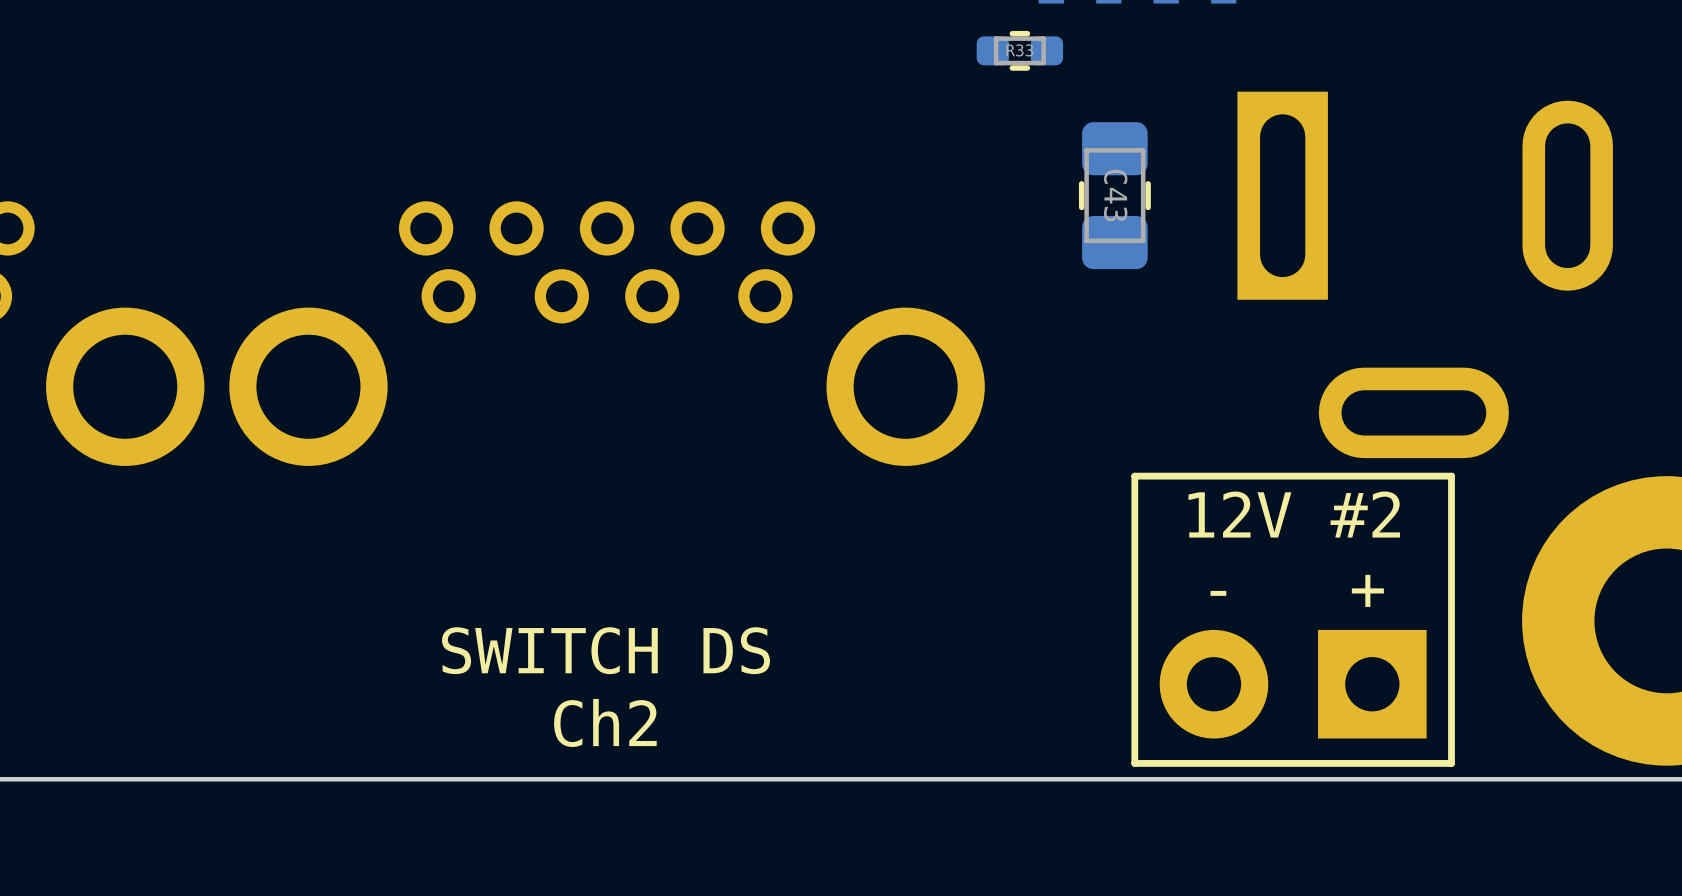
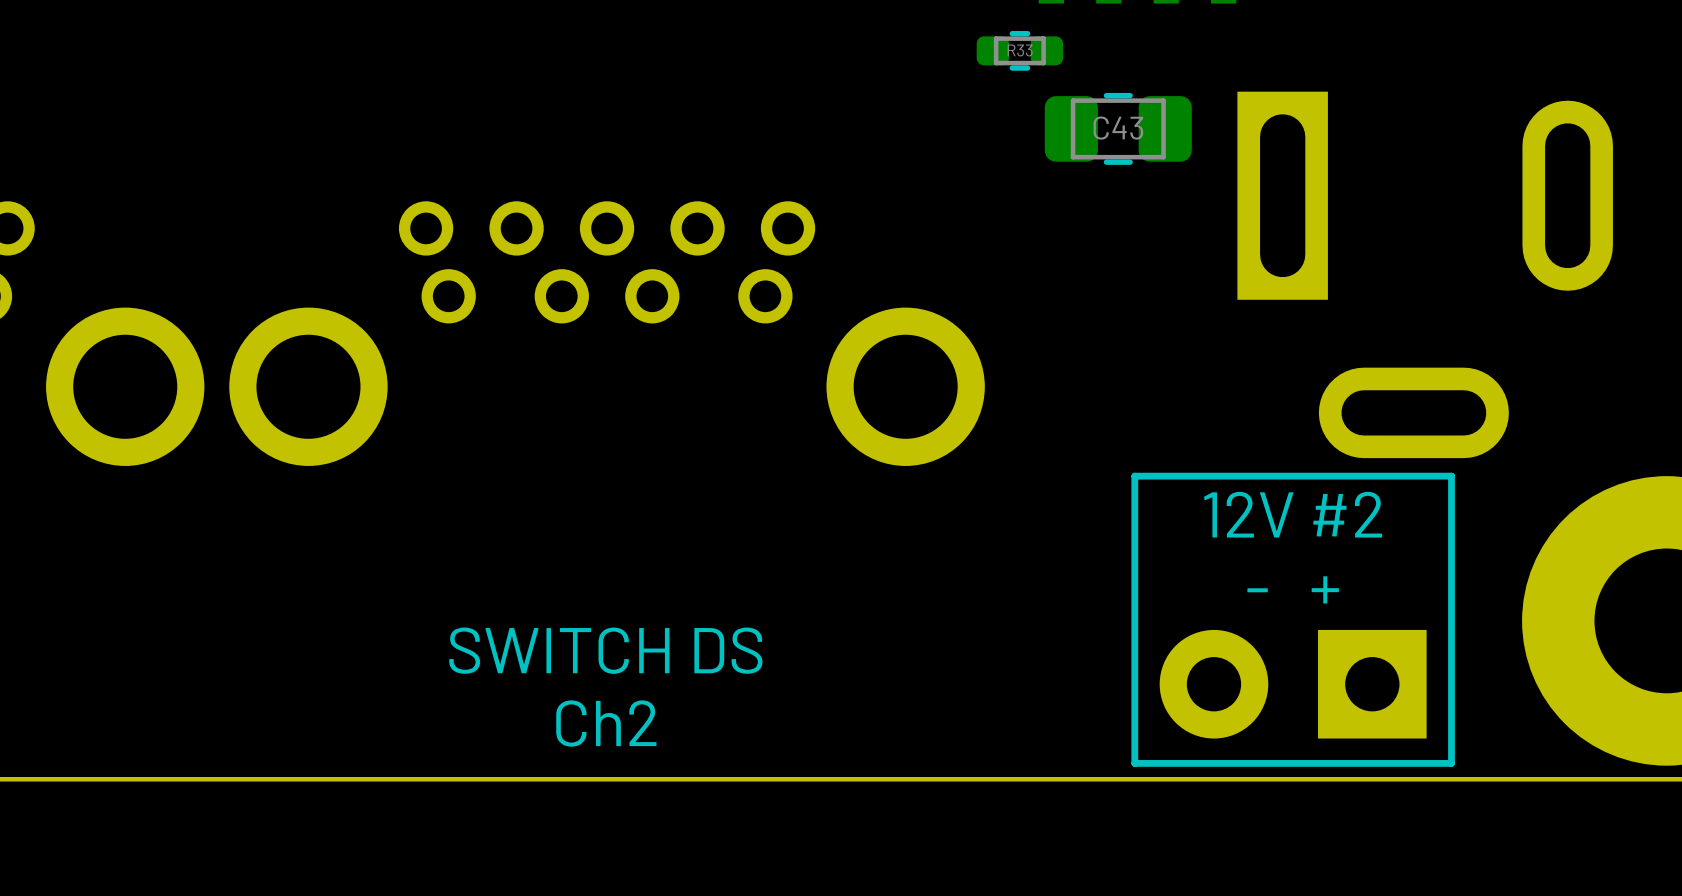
C43 rotation: 0° (1114, 195) -> 90° clockwise (1118, 128)

